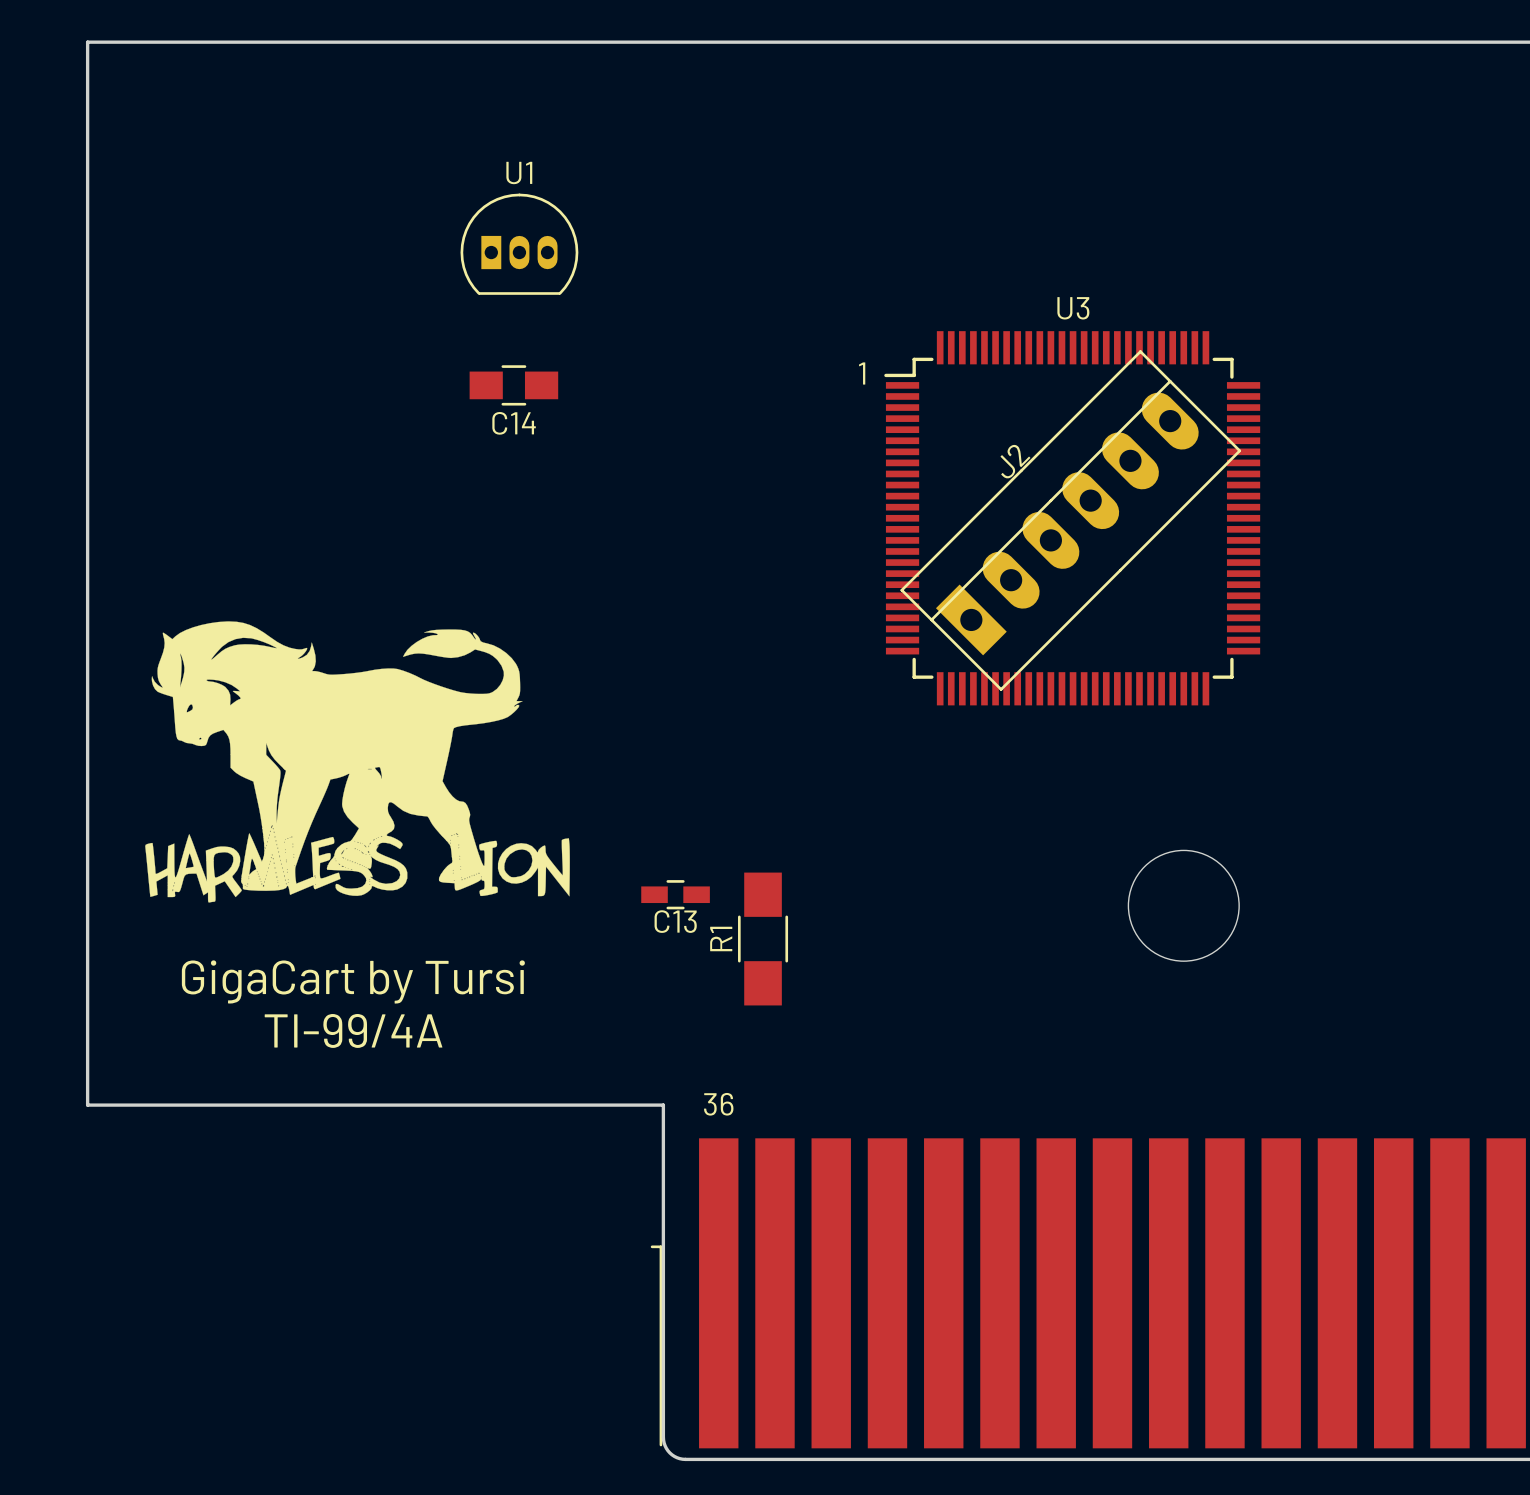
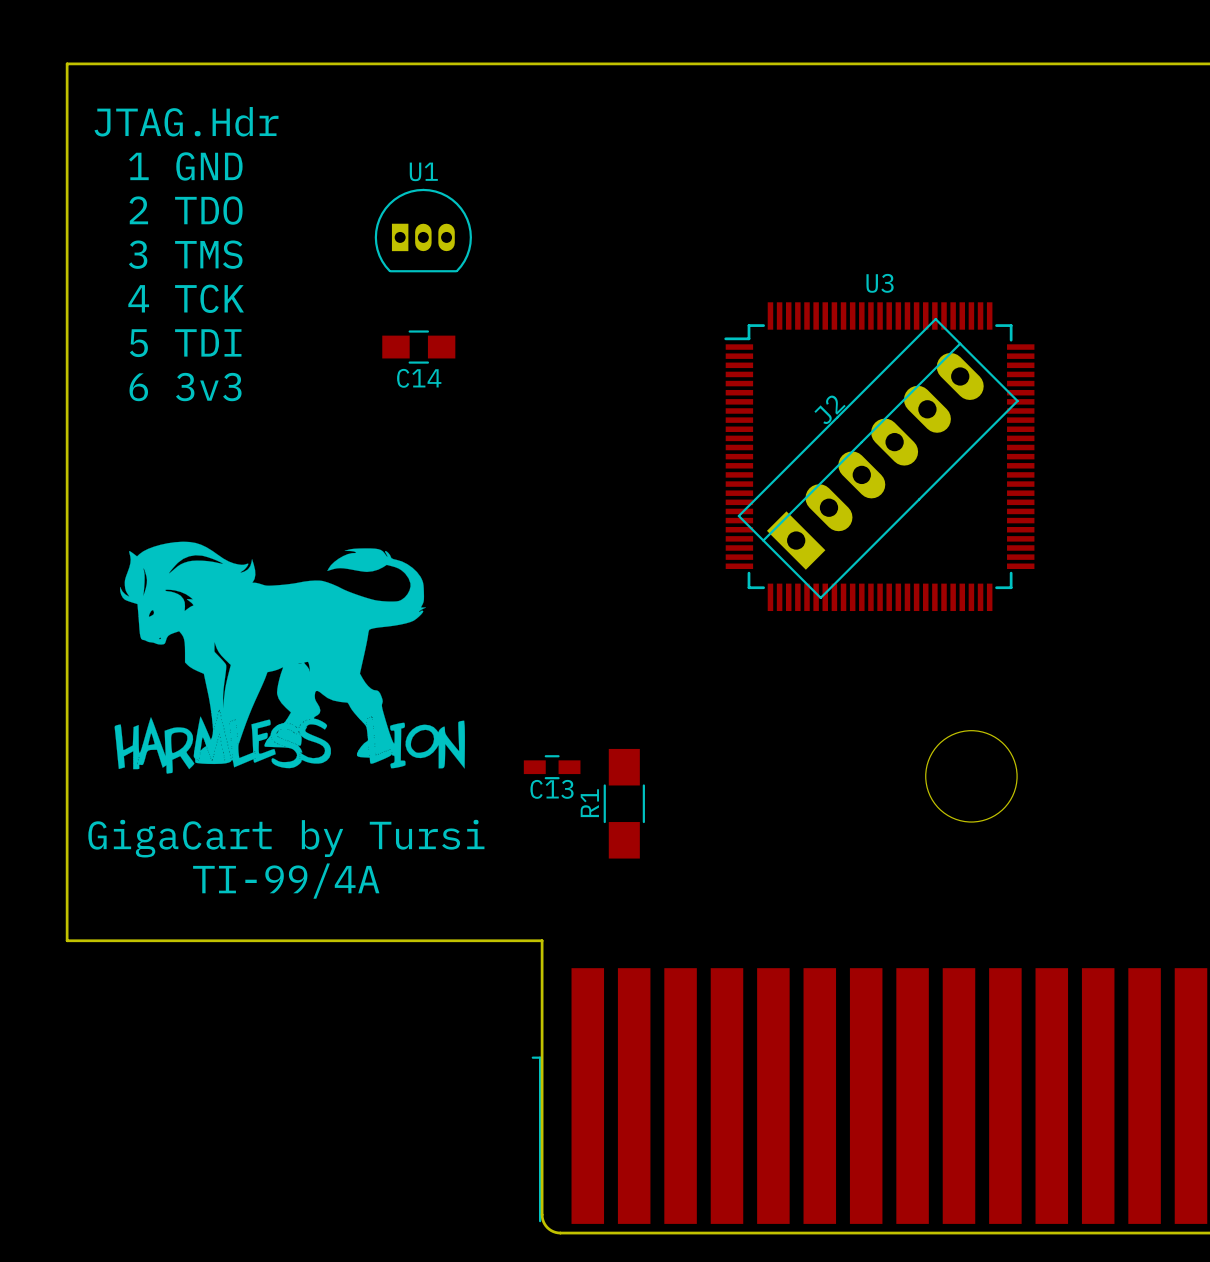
text: none -> JTAG.Hdr (186, 121)
text: none -> 1 GND (185, 166)
text: none -> 2 TDO (186, 210)
text: none -> 3 TMS (185, 254)
text: none -> 4 TCK (186, 298)
text: 1 (862, 373) -> none
text: none -> 5 TDI (185, 343)
text: none -> 6 3v3 (185, 387)
text: 36 (718, 1104) -> none

